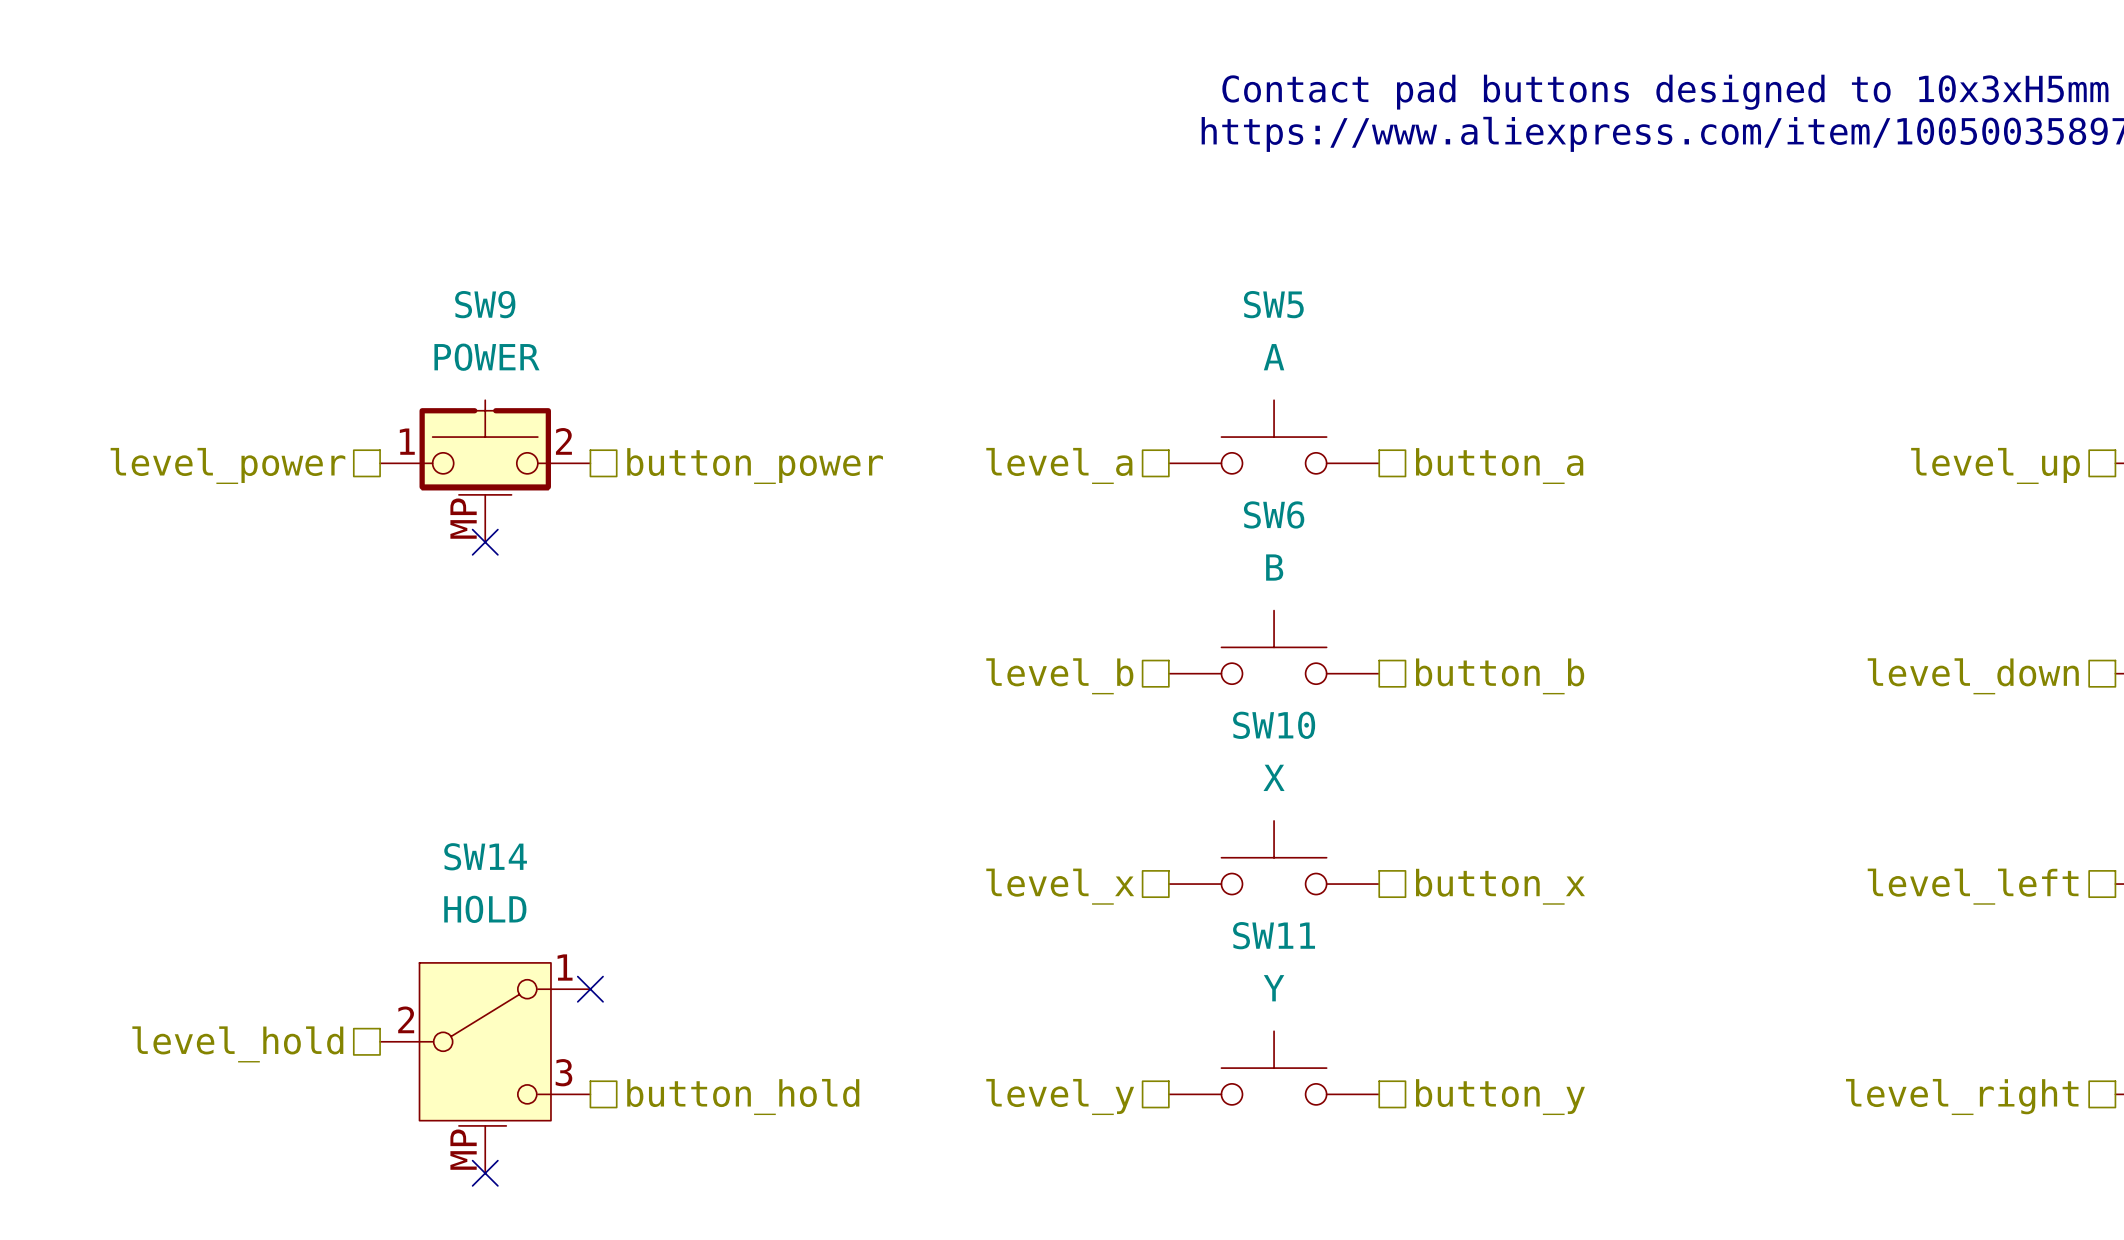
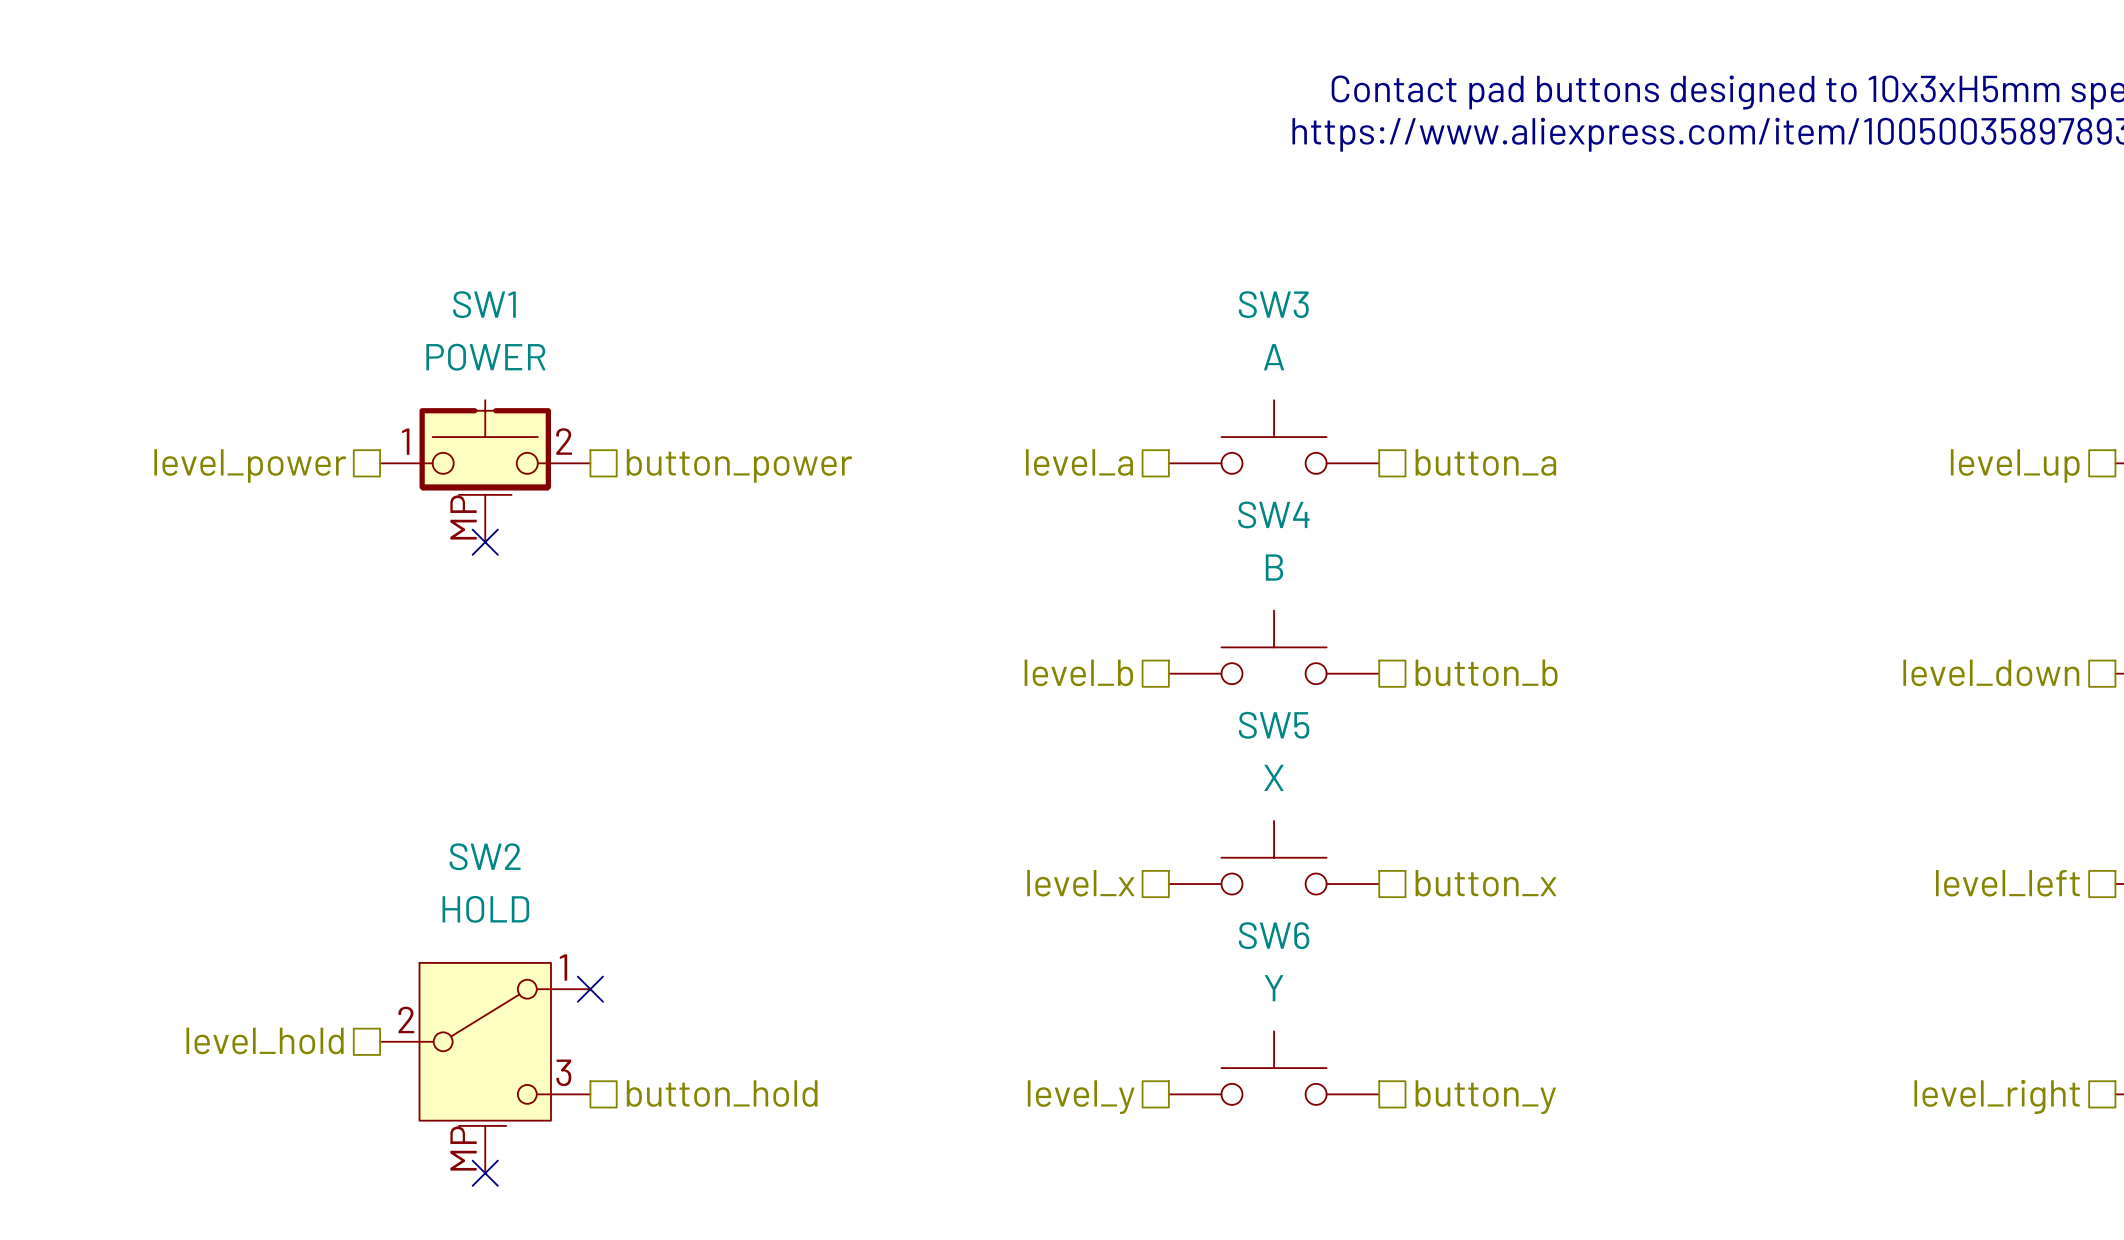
SW9 name: SW9 (485, 304) -> SW1 (484, 304)
SW5 name: SW5 (1273, 304) -> SW3 (1273, 304)
SW6 name: SW6 (1274, 514) -> SW4 (1273, 514)
SW10 name: SW10 (1274, 725) -> SW5 (1274, 725)
SW14 name: SW14 (485, 856) -> SW2 (485, 856)
SW11 name: SW11 (1274, 935) -> SW6 (1274, 935)

